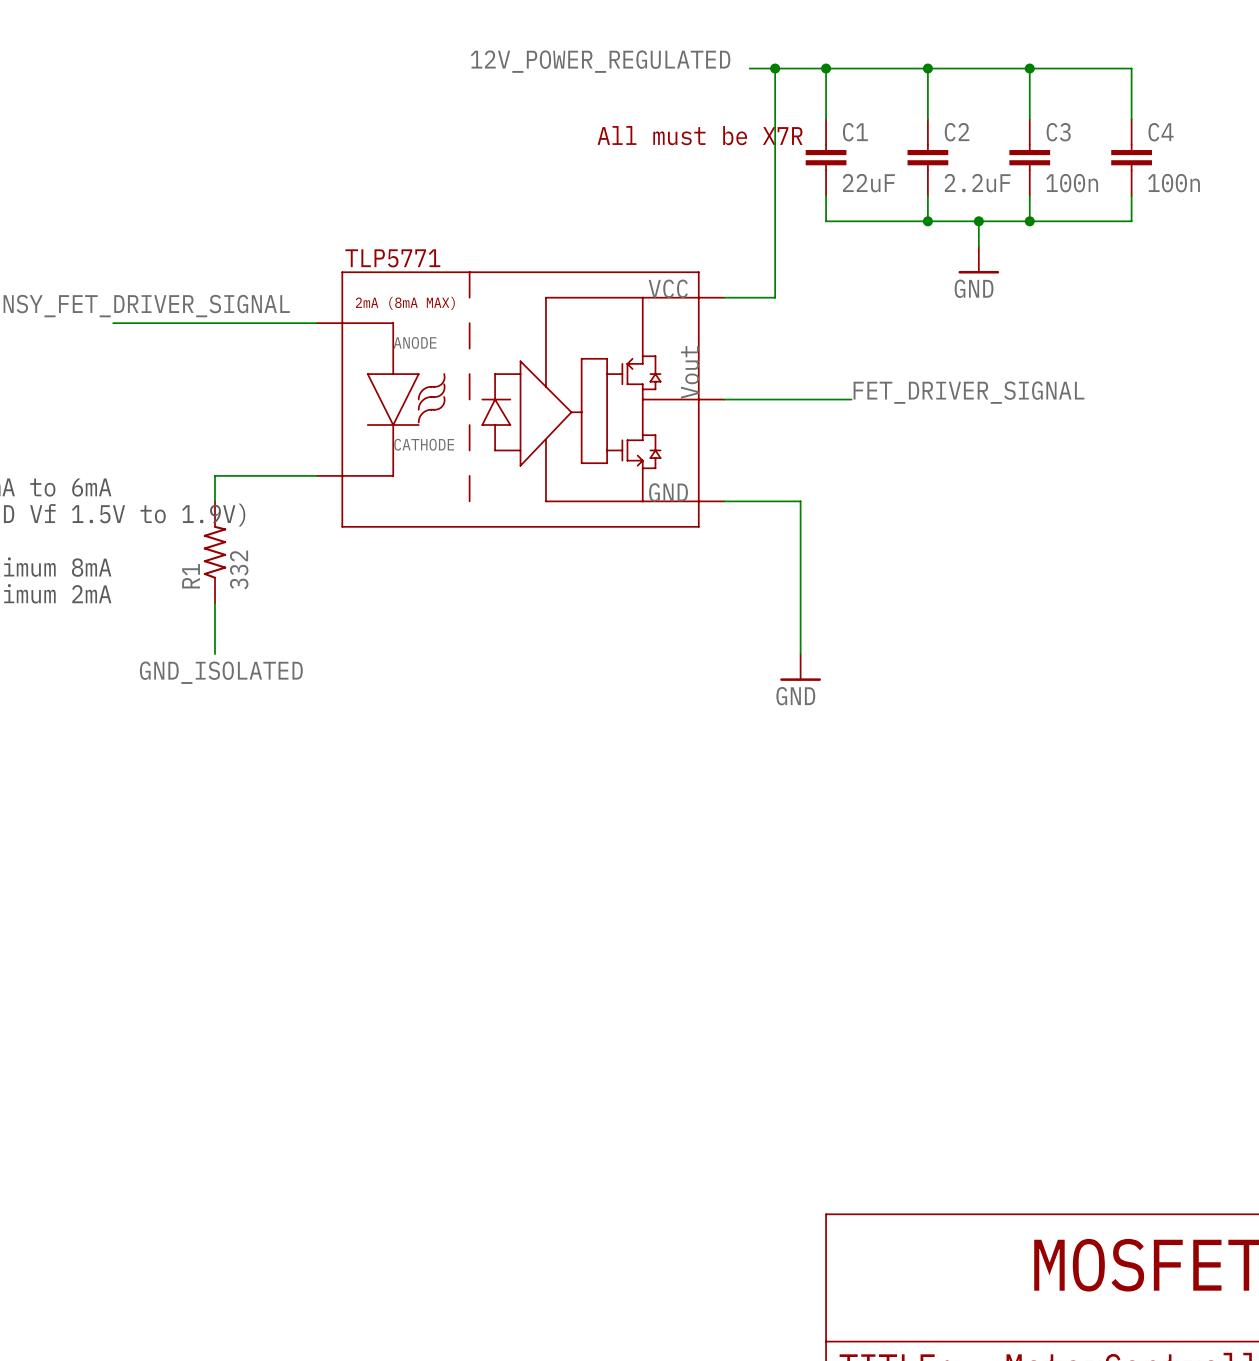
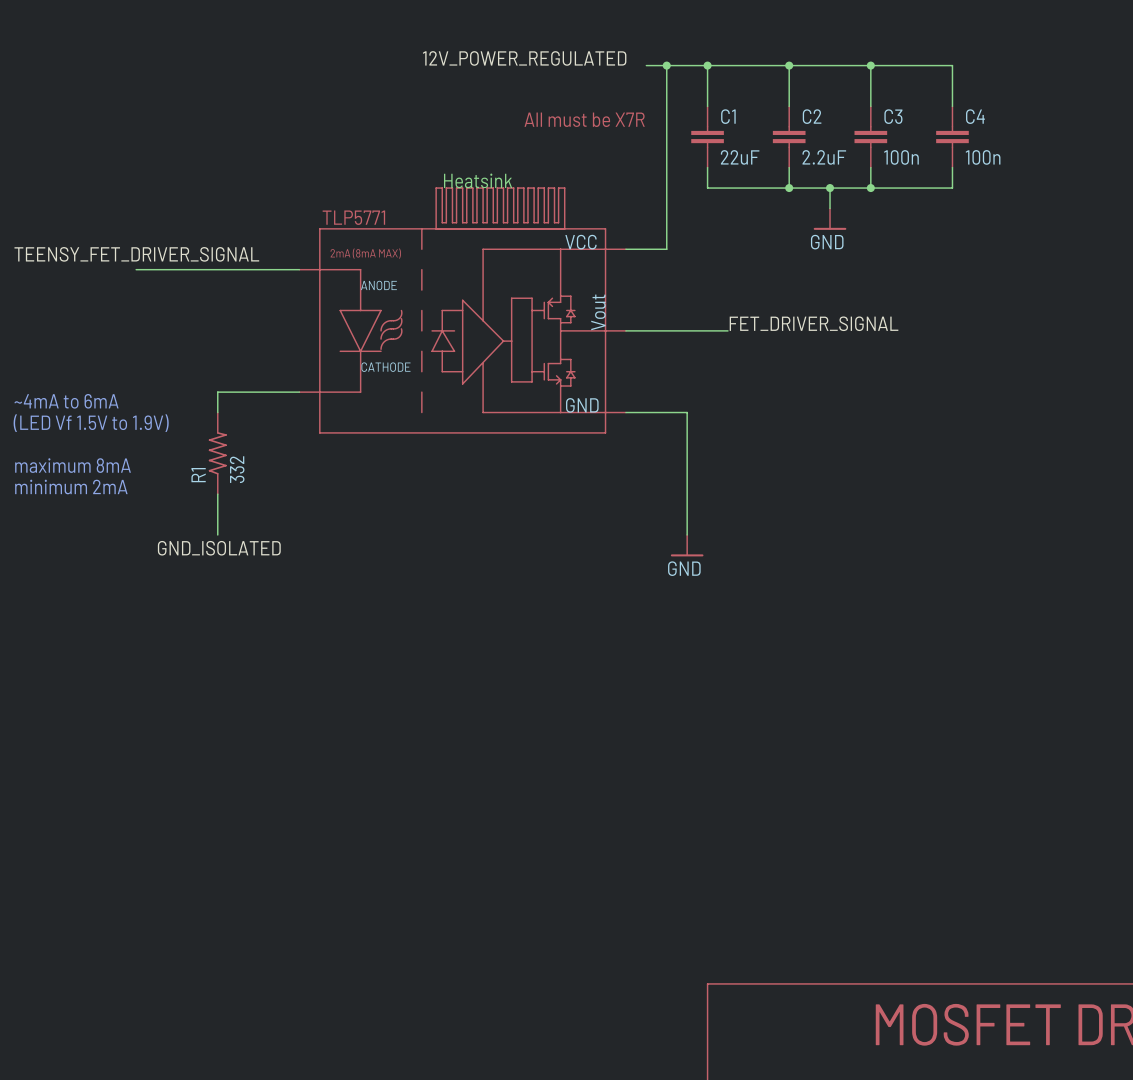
text: none -> Heatsink (478, 180)
part: none -> (500, 208)

